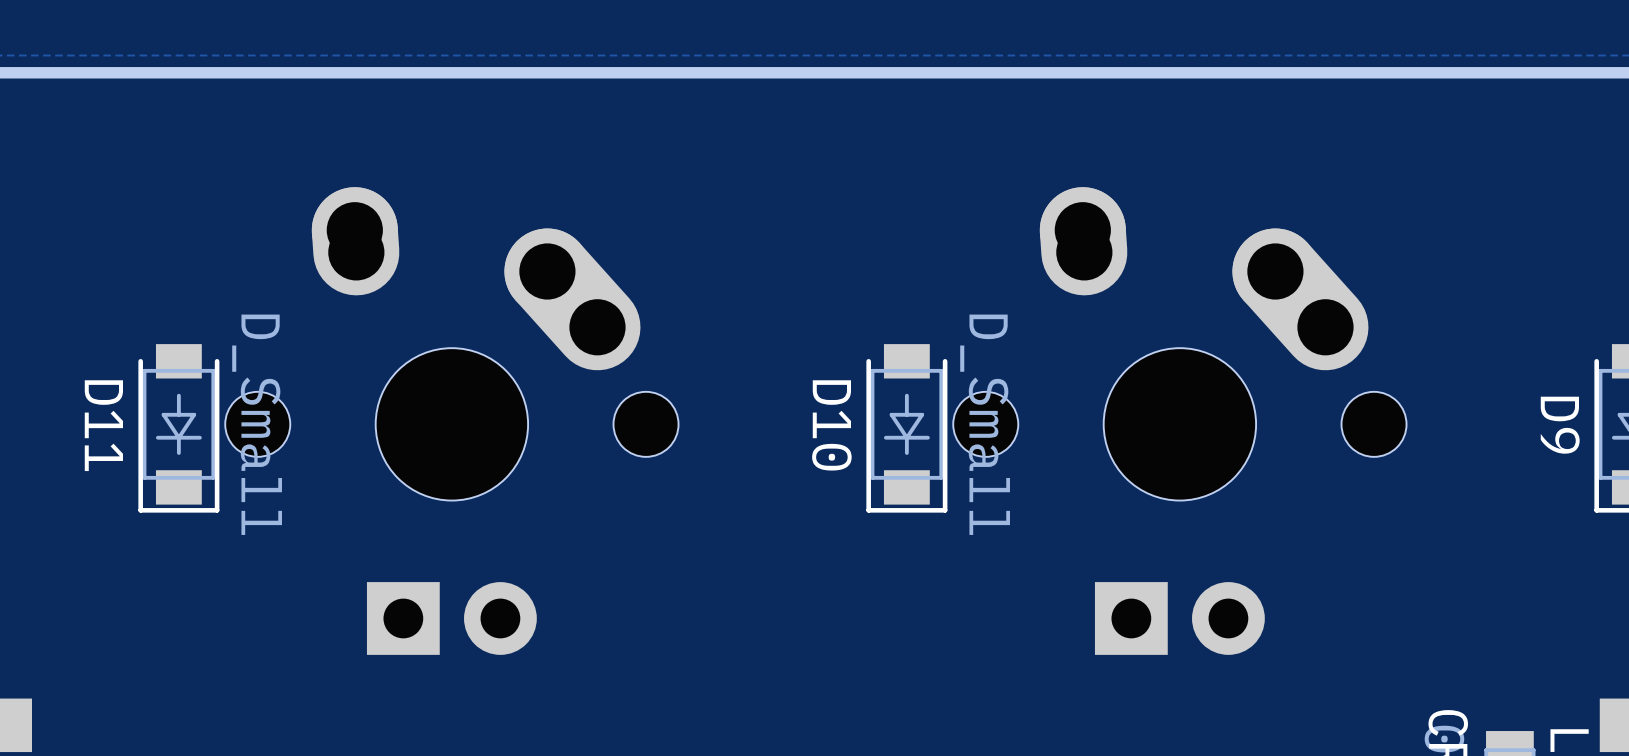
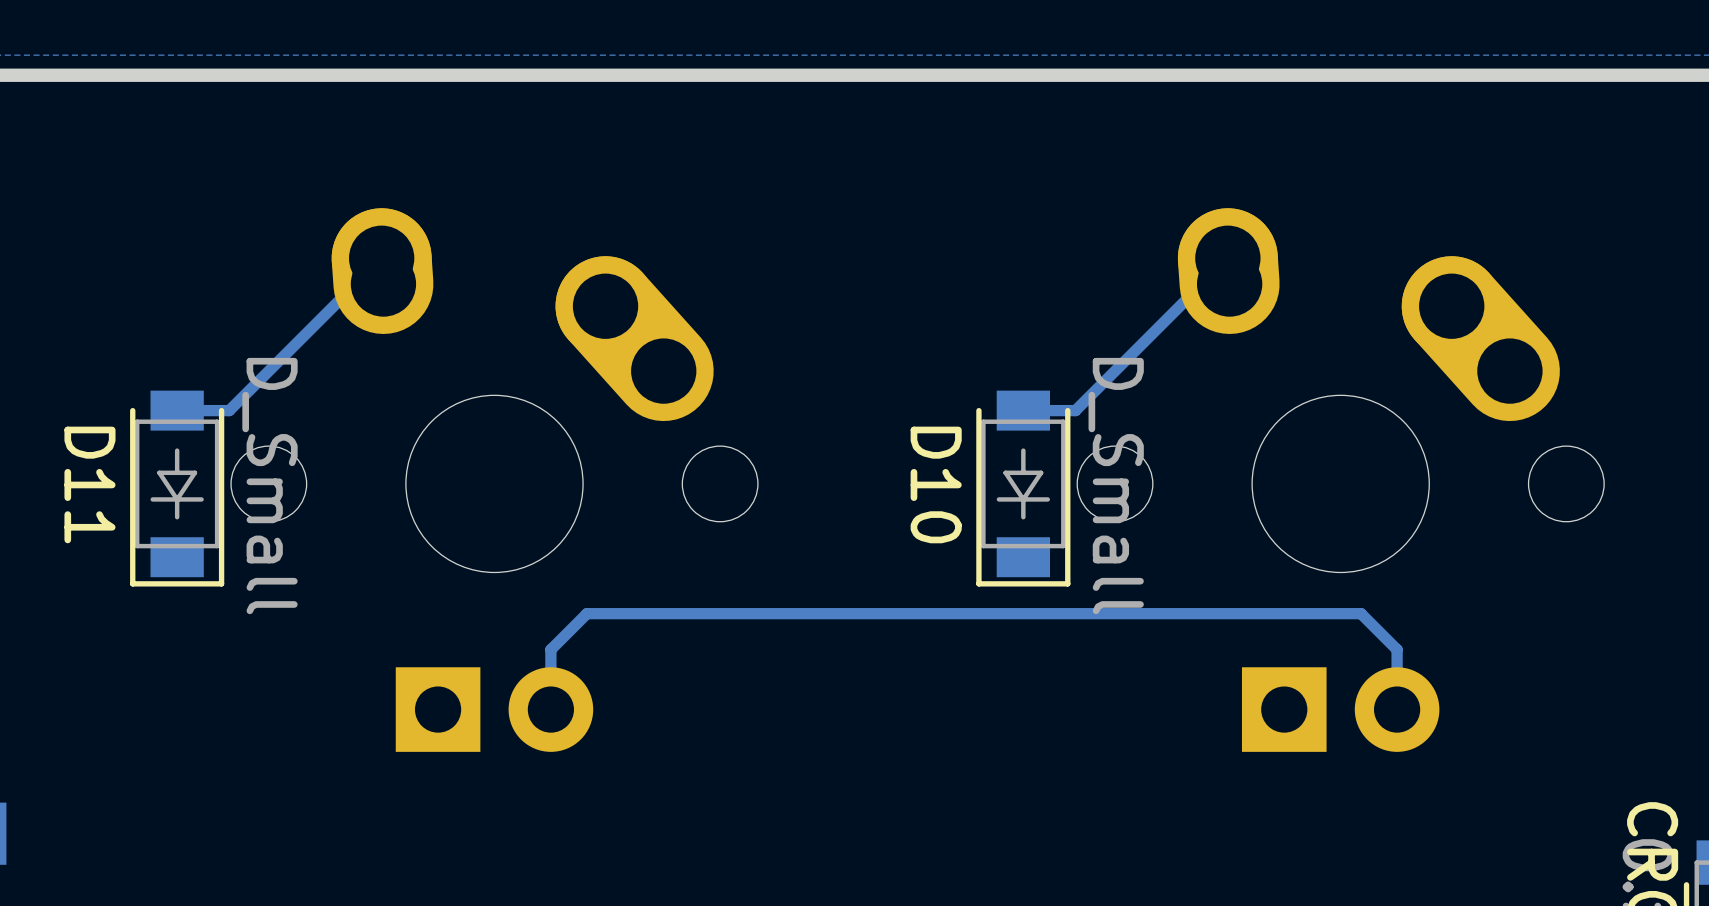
track: none -> (381, 258) (229, 410) (177, 410)
track: none -> (1227, 258) (1075, 410) (1023, 410)
track: none -> (1397, 709) (1397, 649) (1361, 613) (586, 613) (550, 649) (550, 709)

